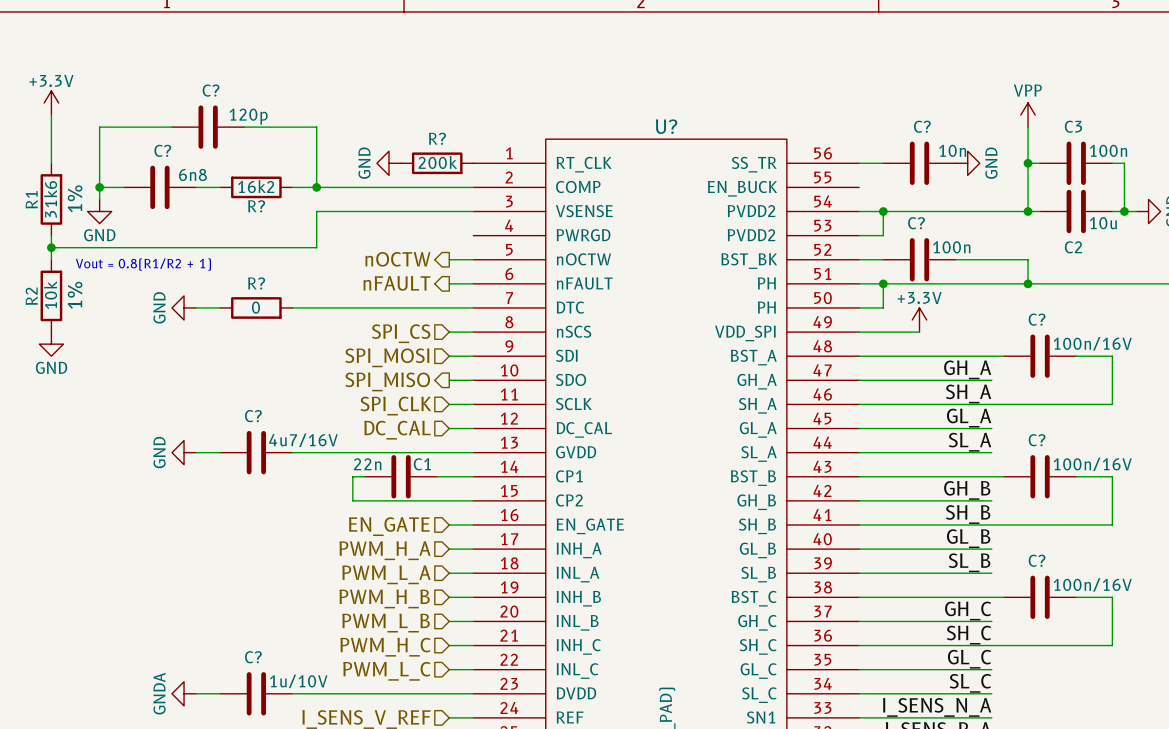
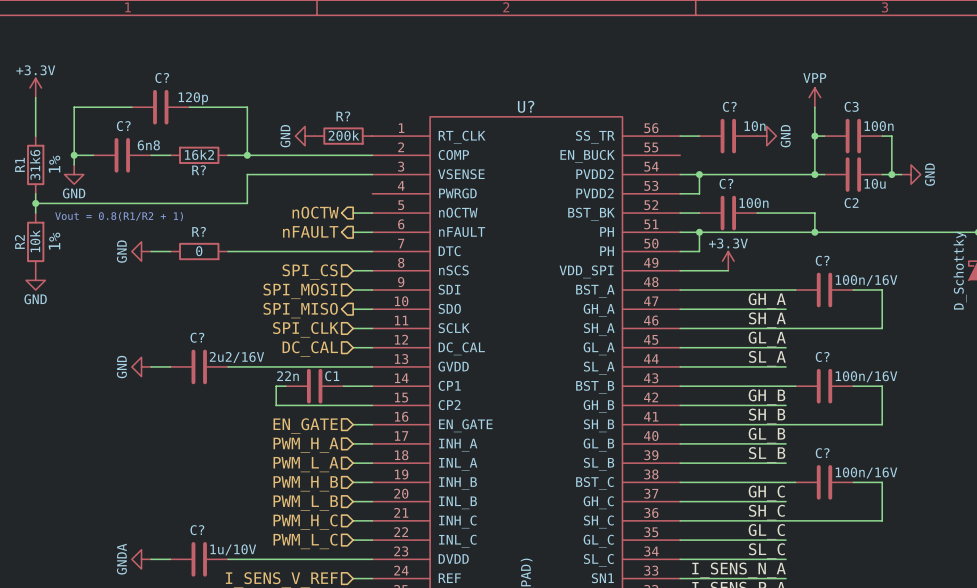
C? value: 4u7/16V (303, 440) -> 2u2/16V (236, 357)

